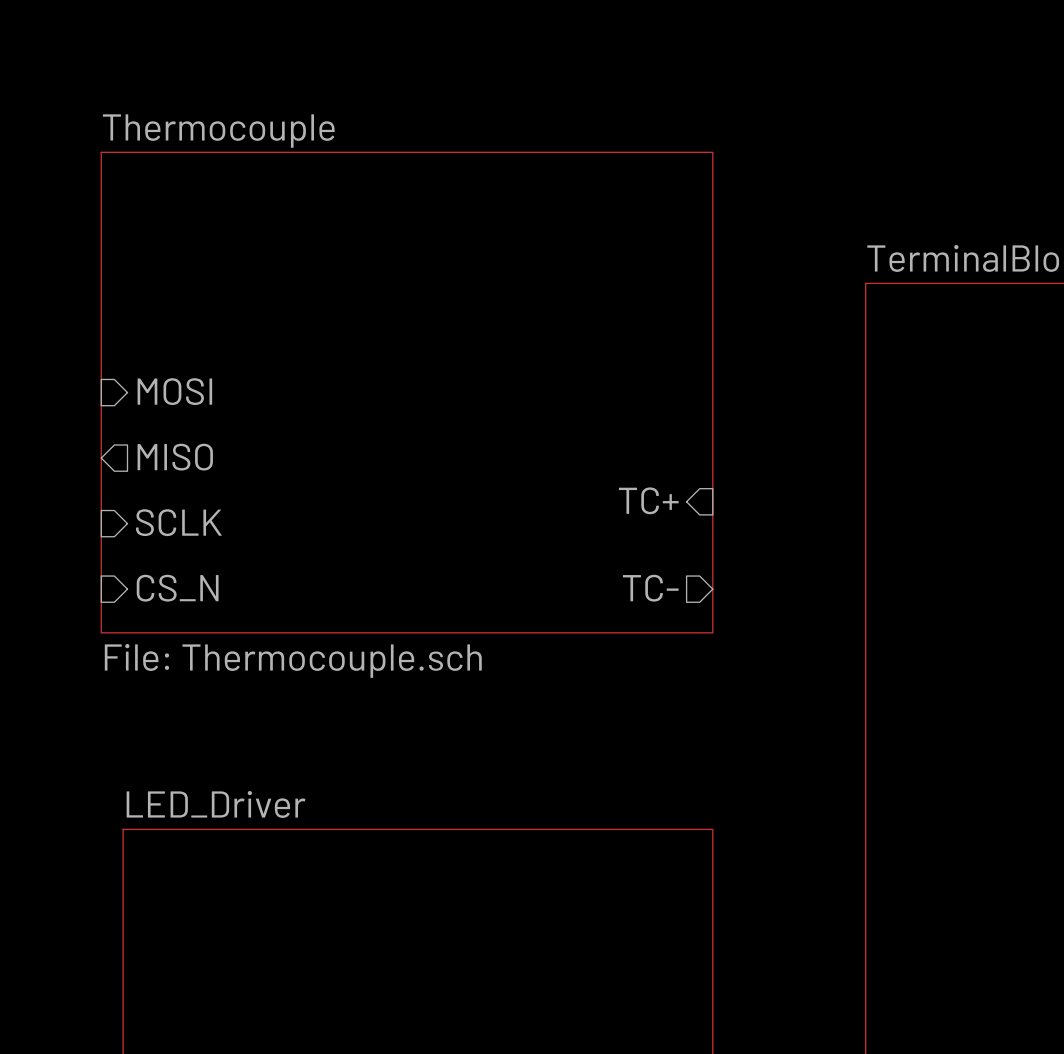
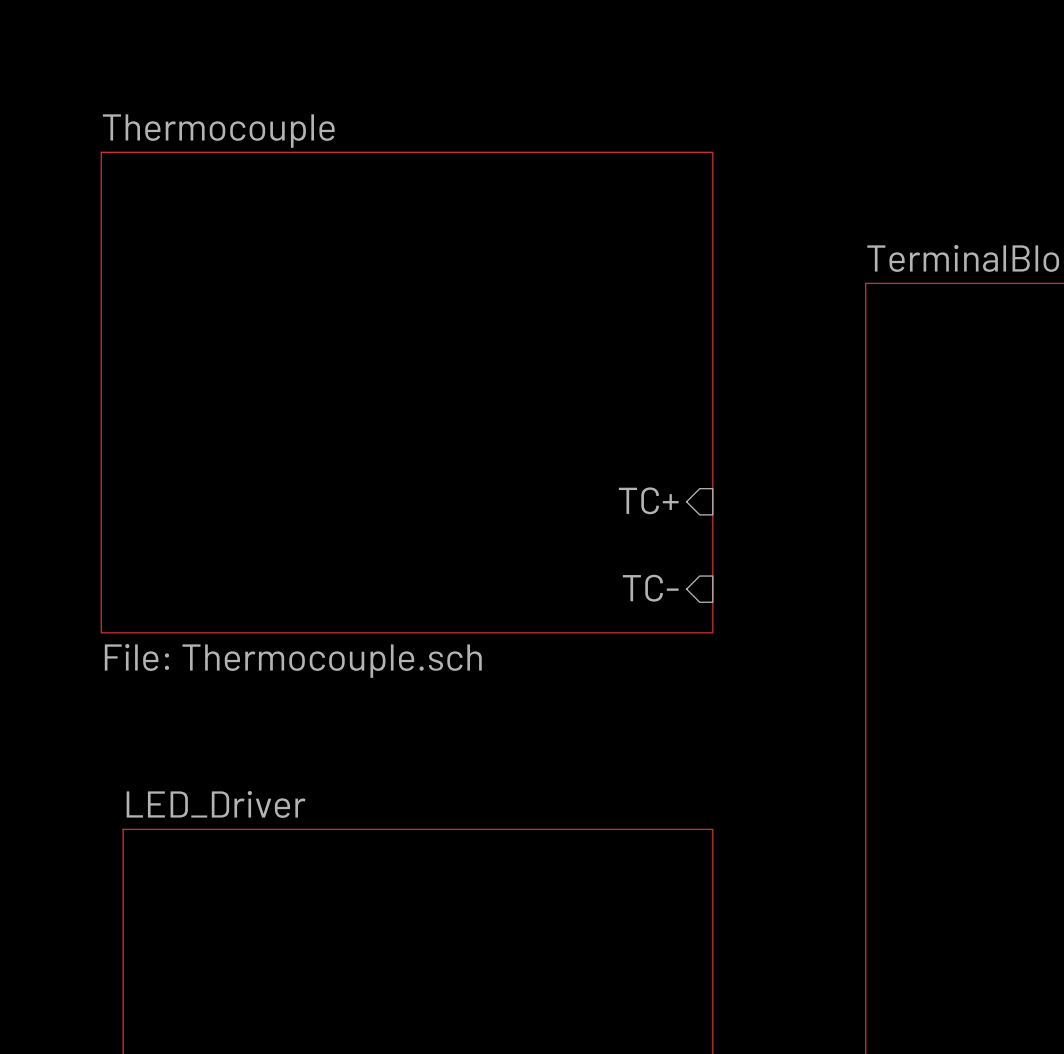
sheet pin: MOSI (174, 391) -> none
sheet pin: MISO (175, 457) -> none
sheet pin: SCLK (178, 522) -> none
sheet pin: CS_N (177, 588) -> none
sheet pin shape: output (650, 588) -> input (650, 588)

